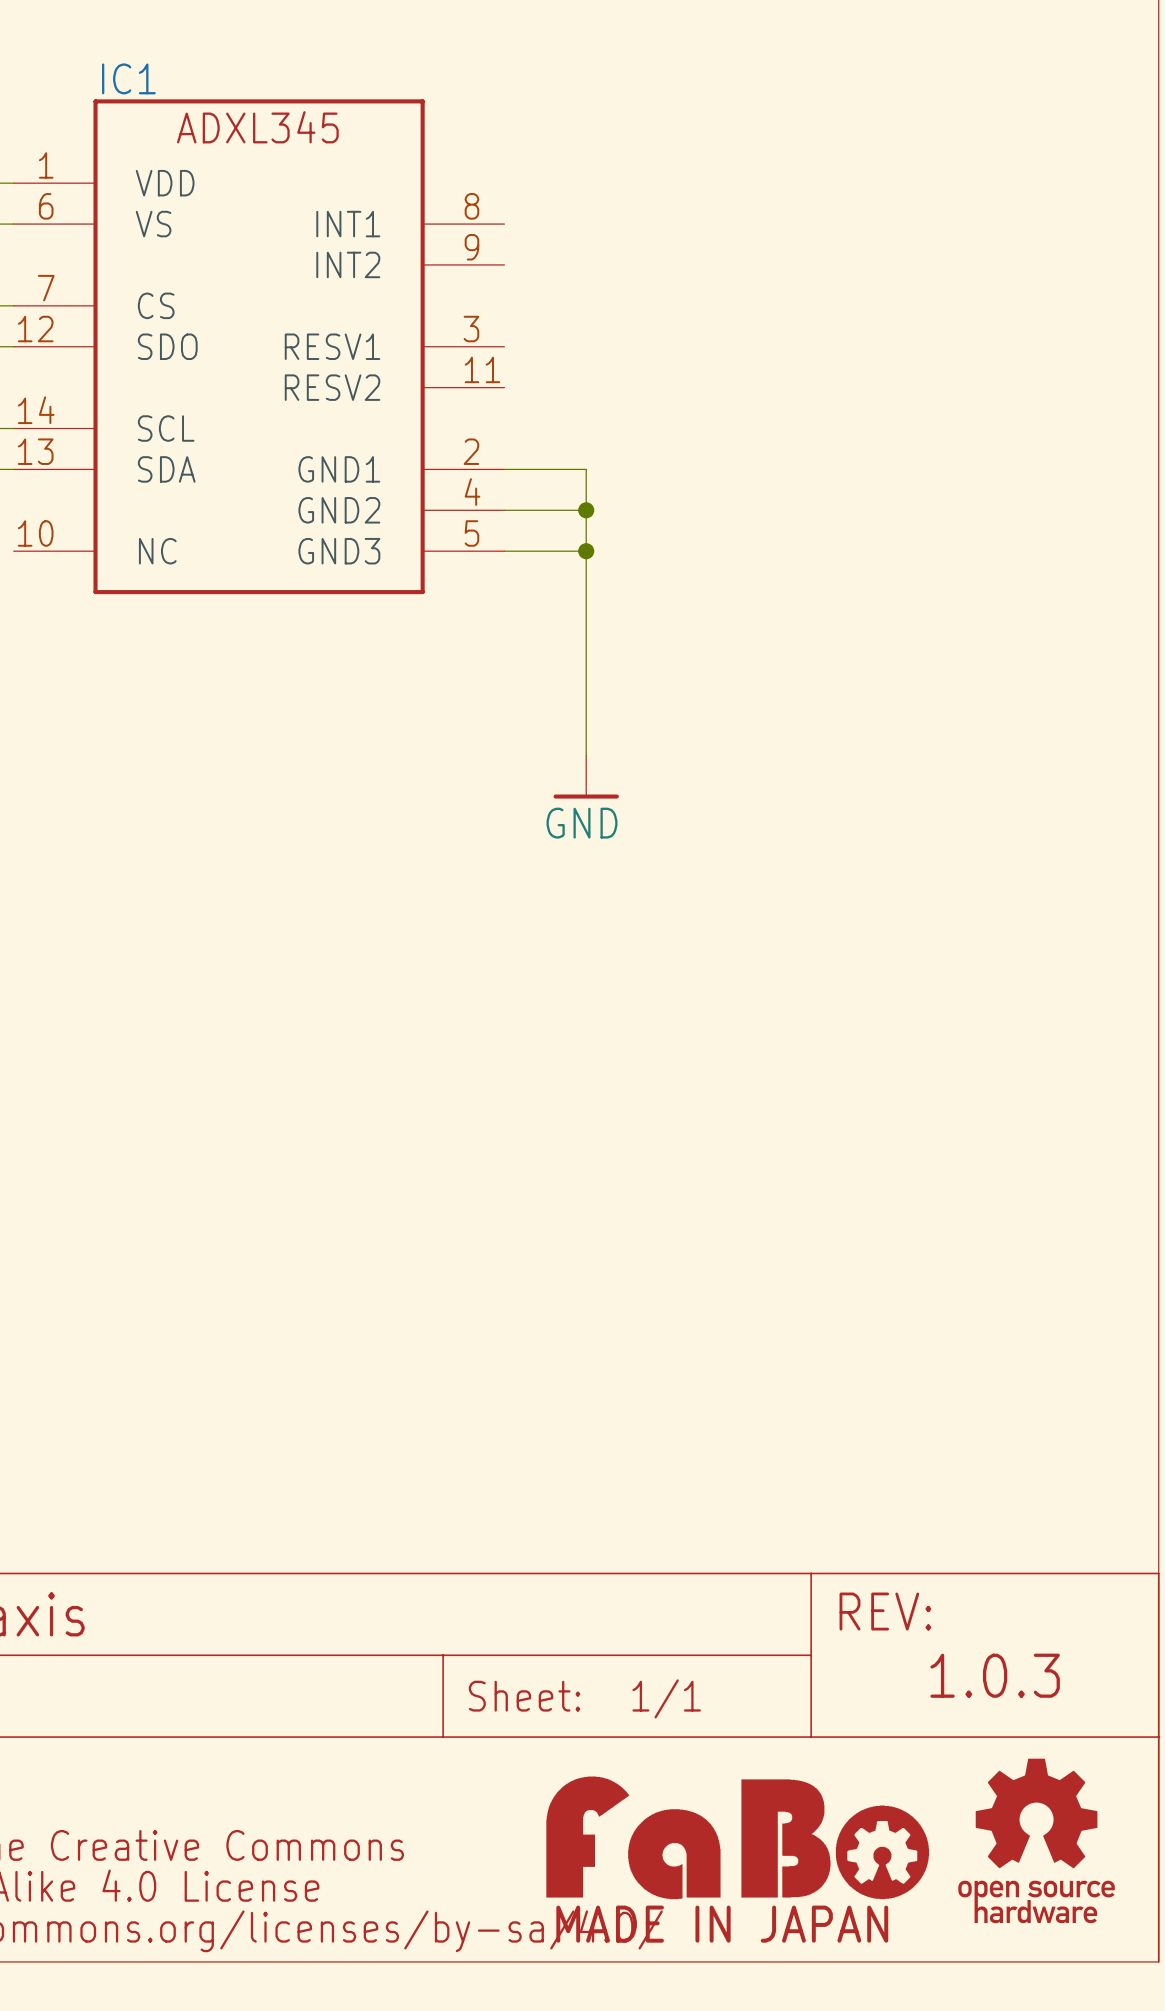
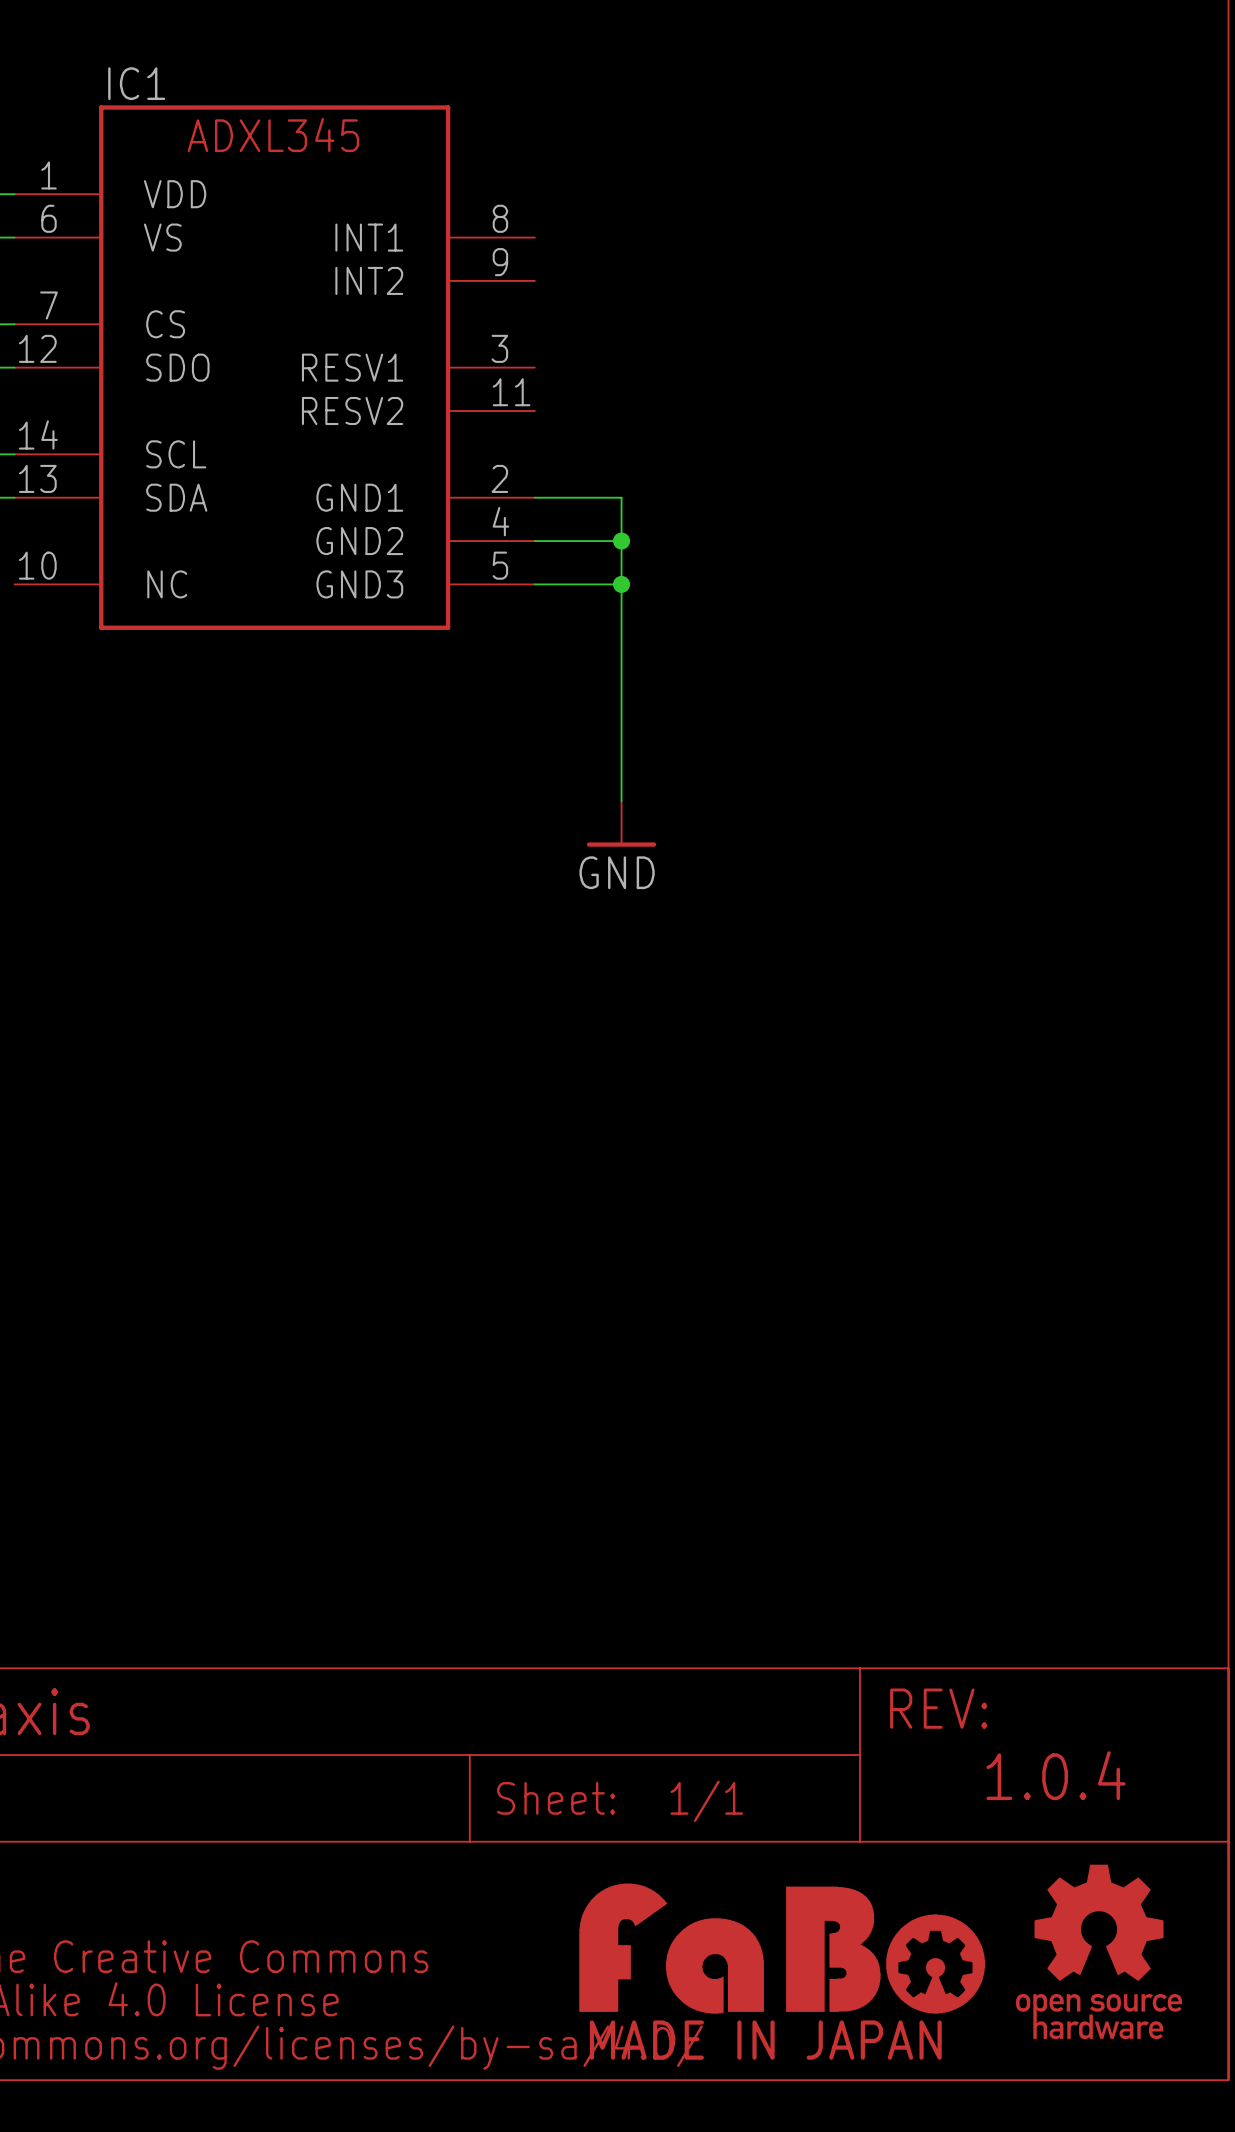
text: 1.0.3 (995, 1675) -> 1.0.4 (1056, 1775)

